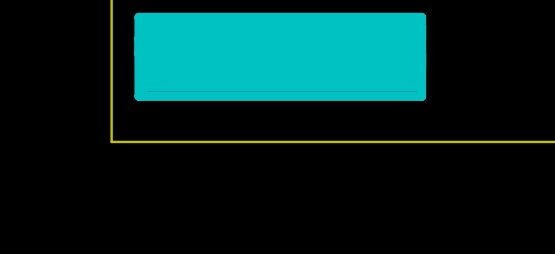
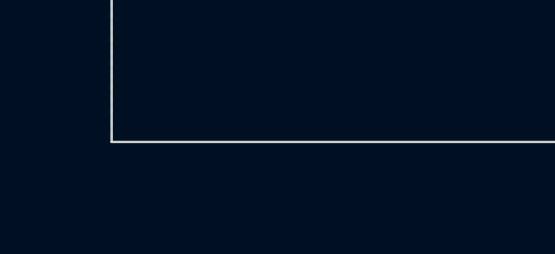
drawing: [134, 12, 427, 101] -> none

